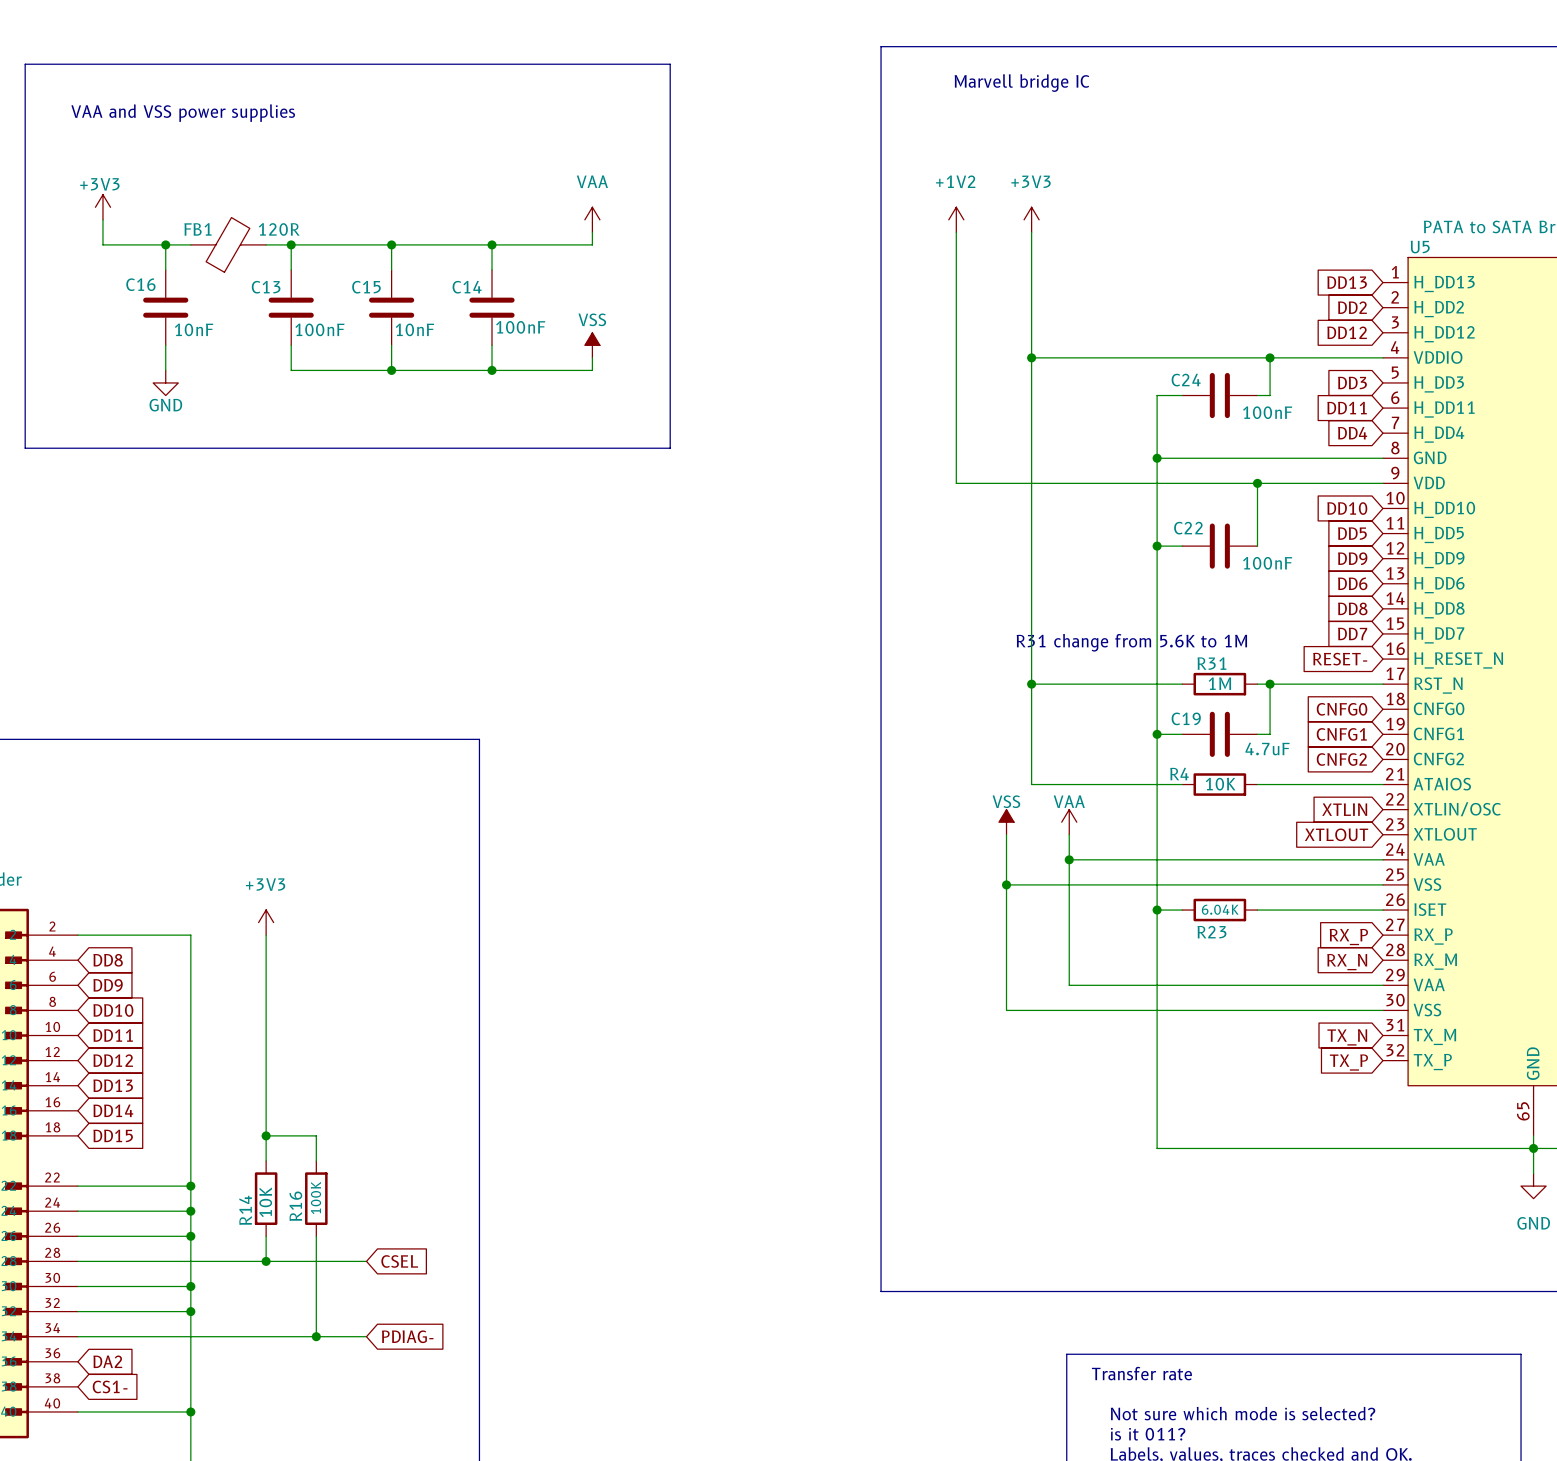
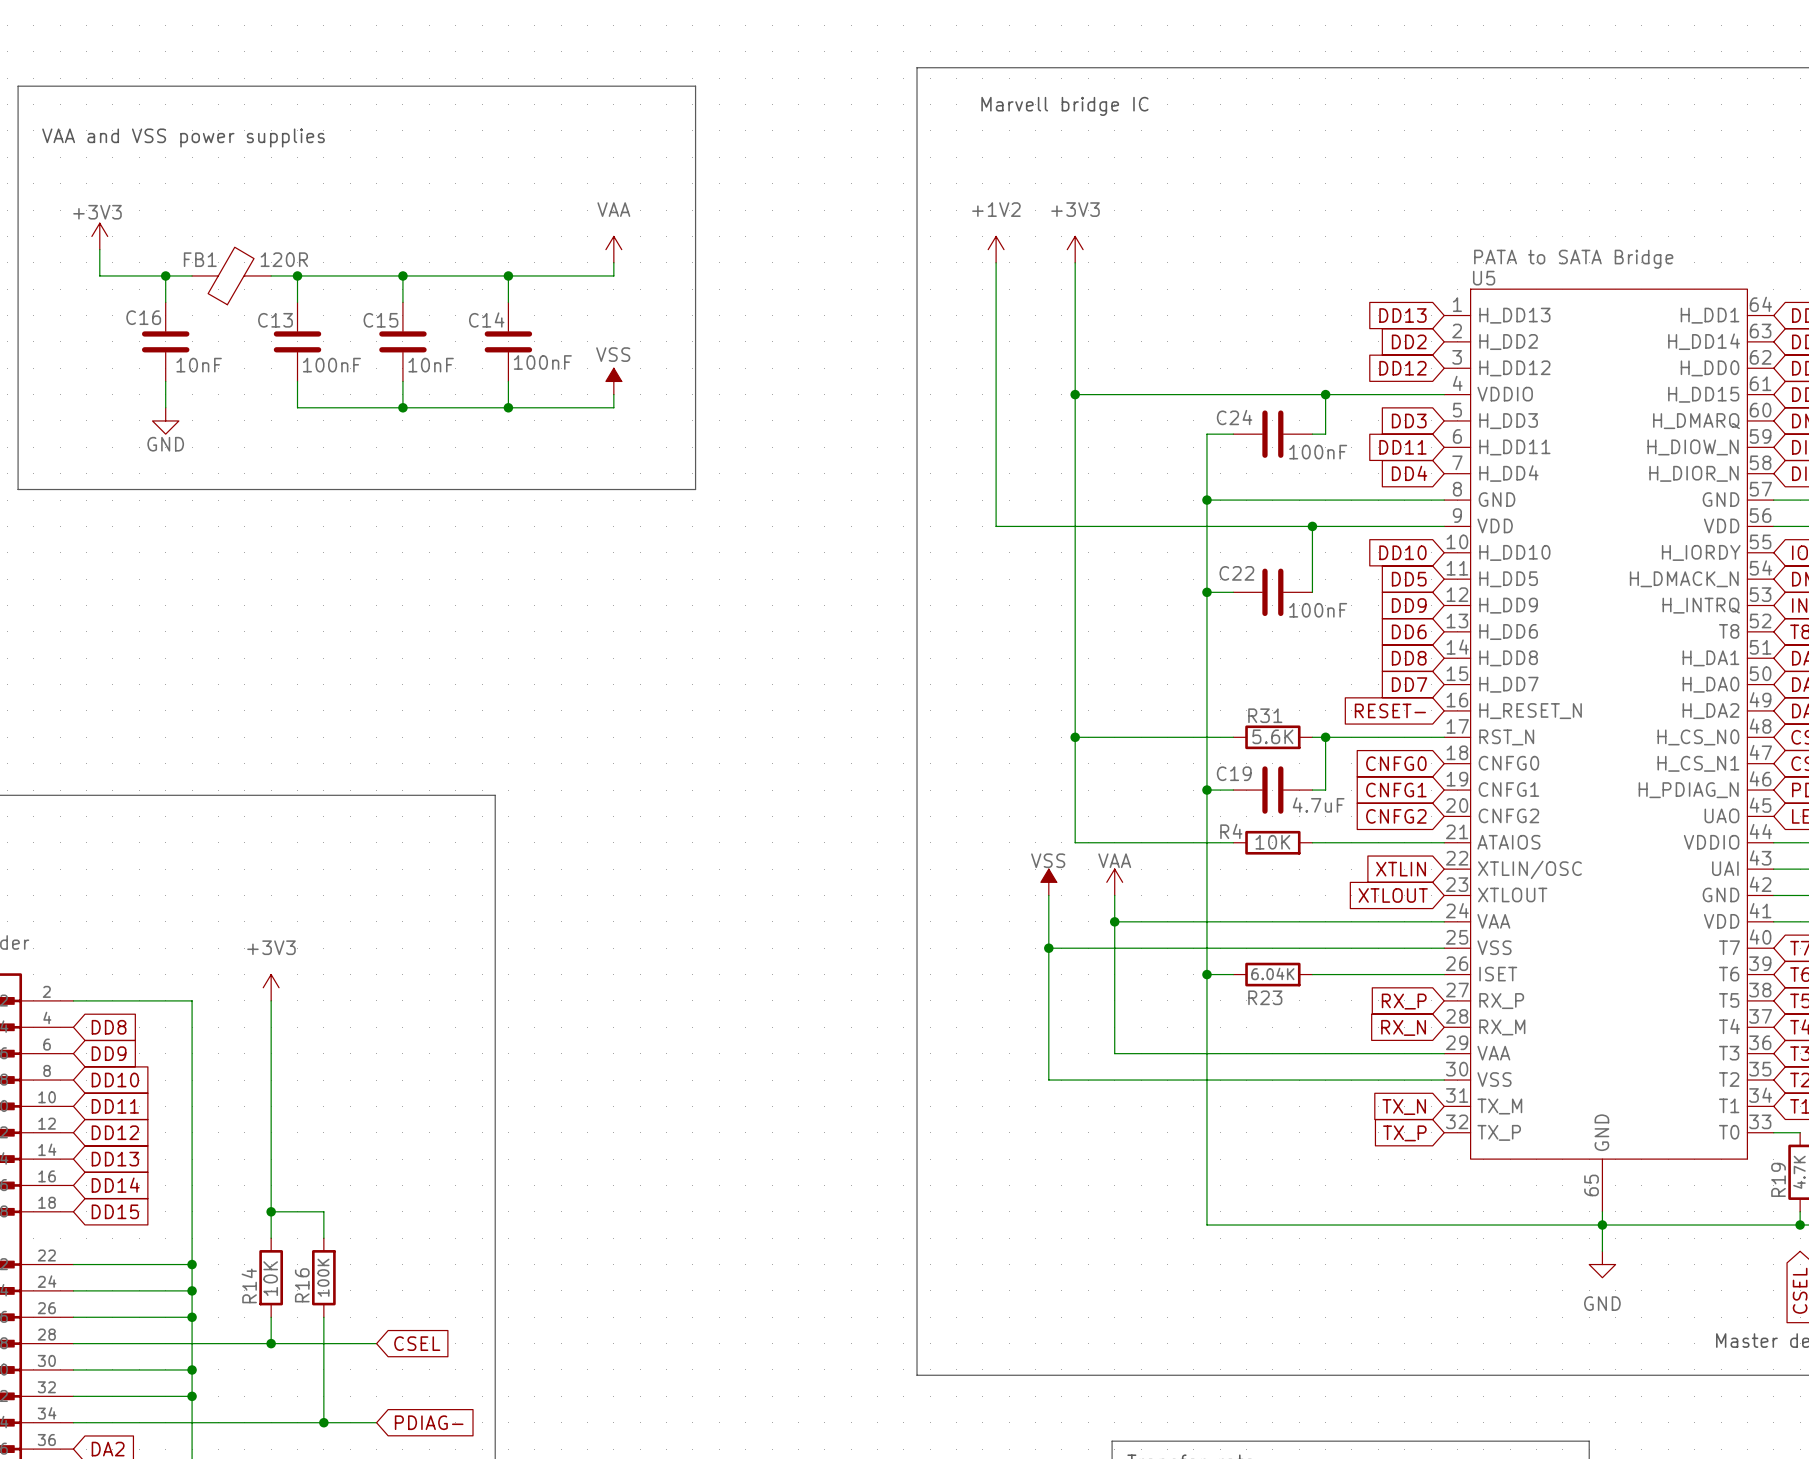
text: R31 change from 5.6K to 1M (1131, 642) -> none
R31 value: 1M (1219, 683) -> 5.6K (1272, 736)

